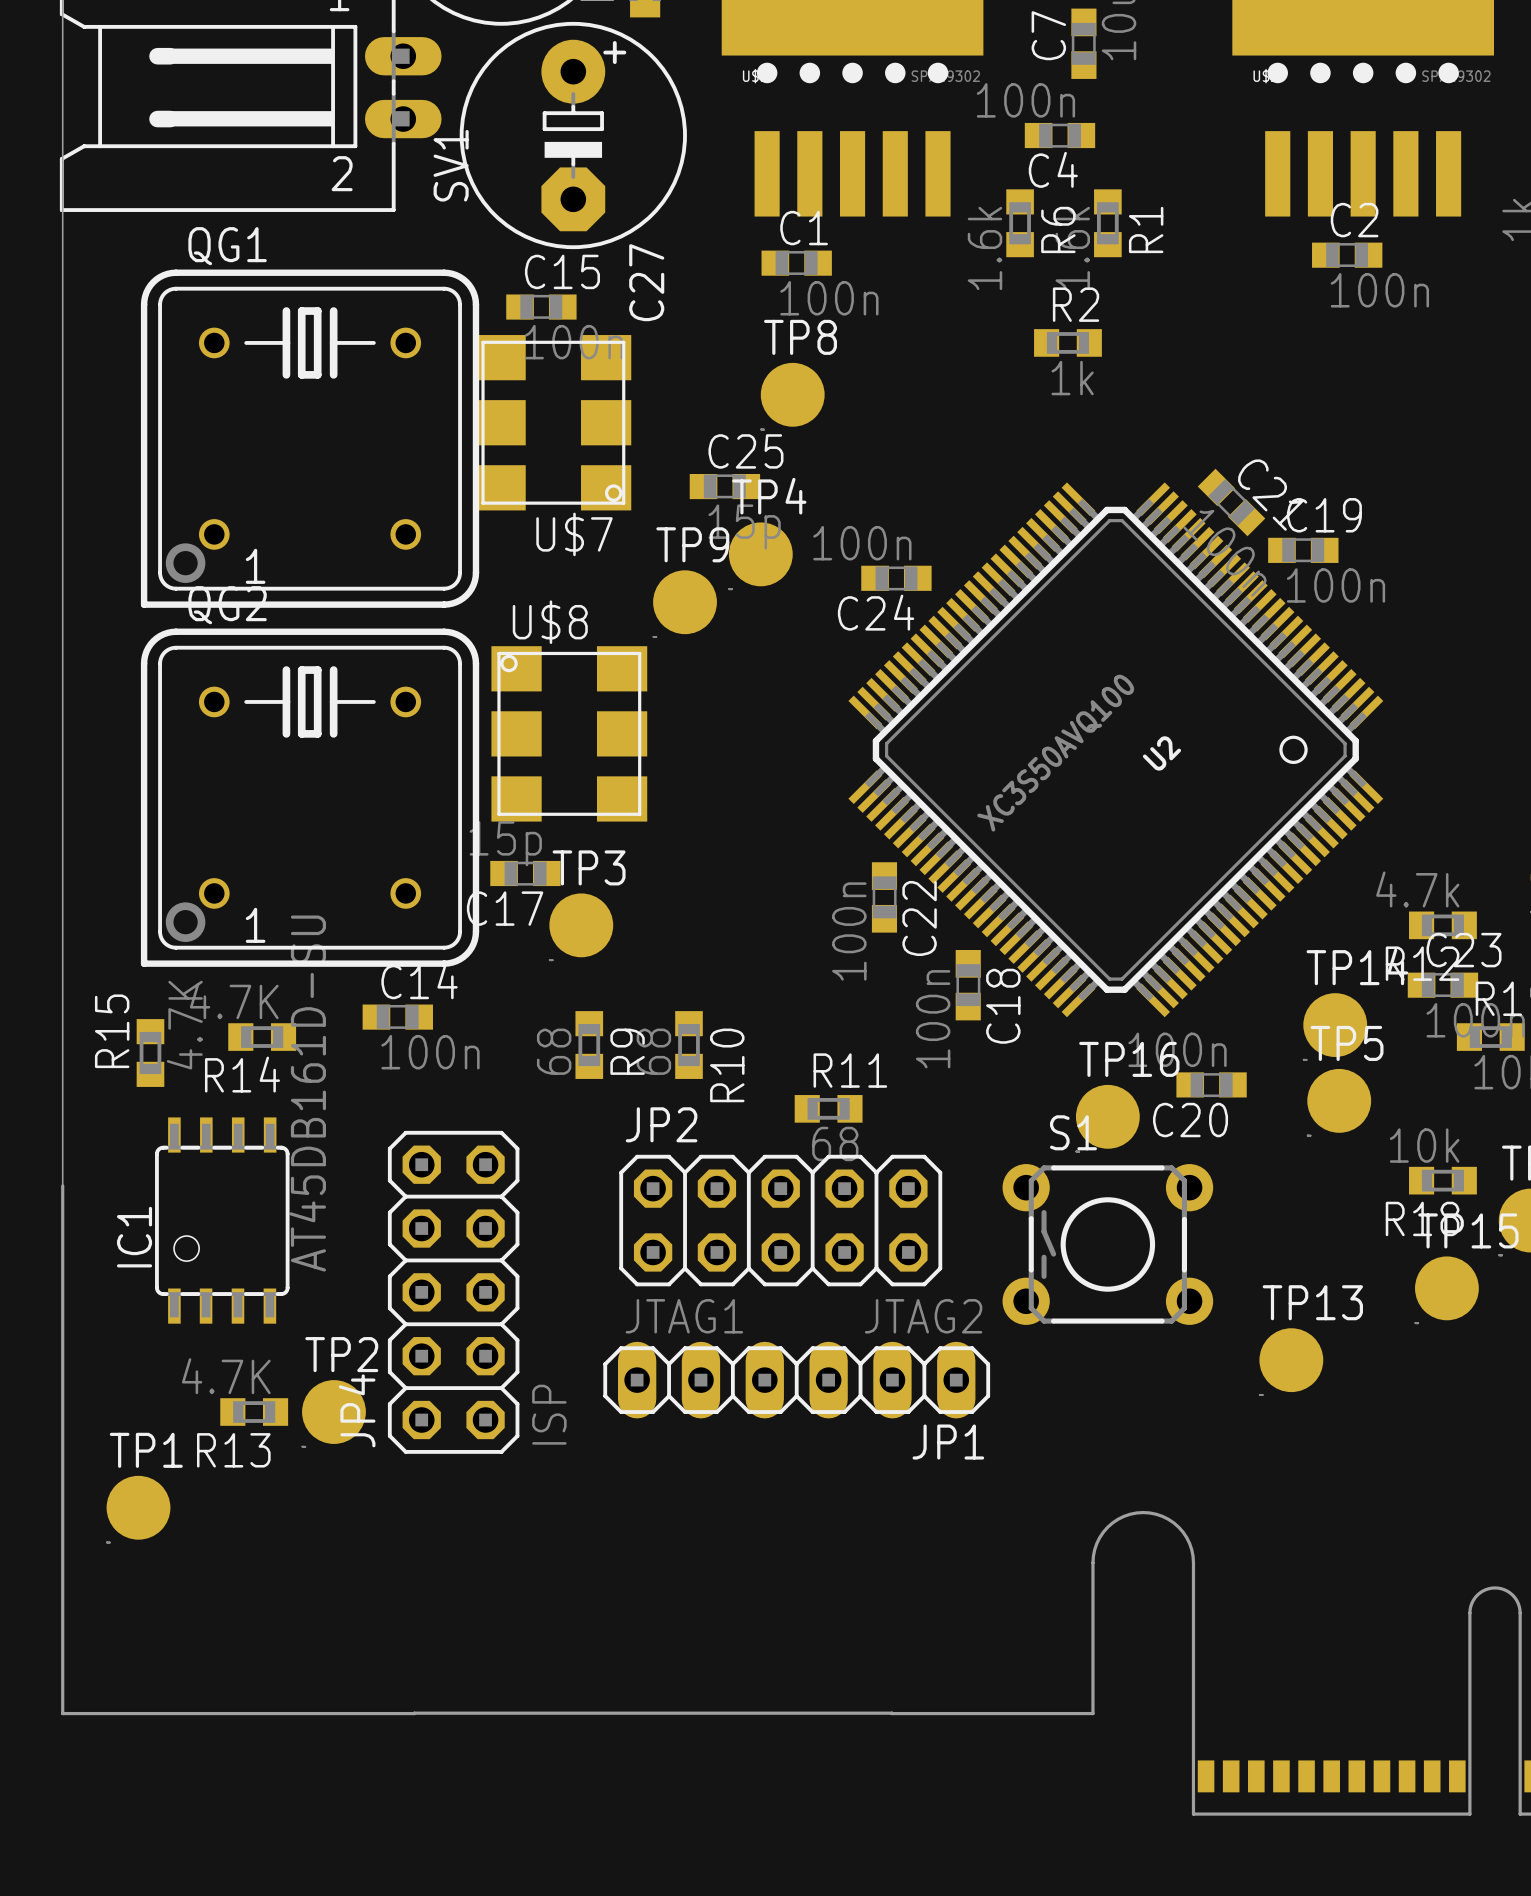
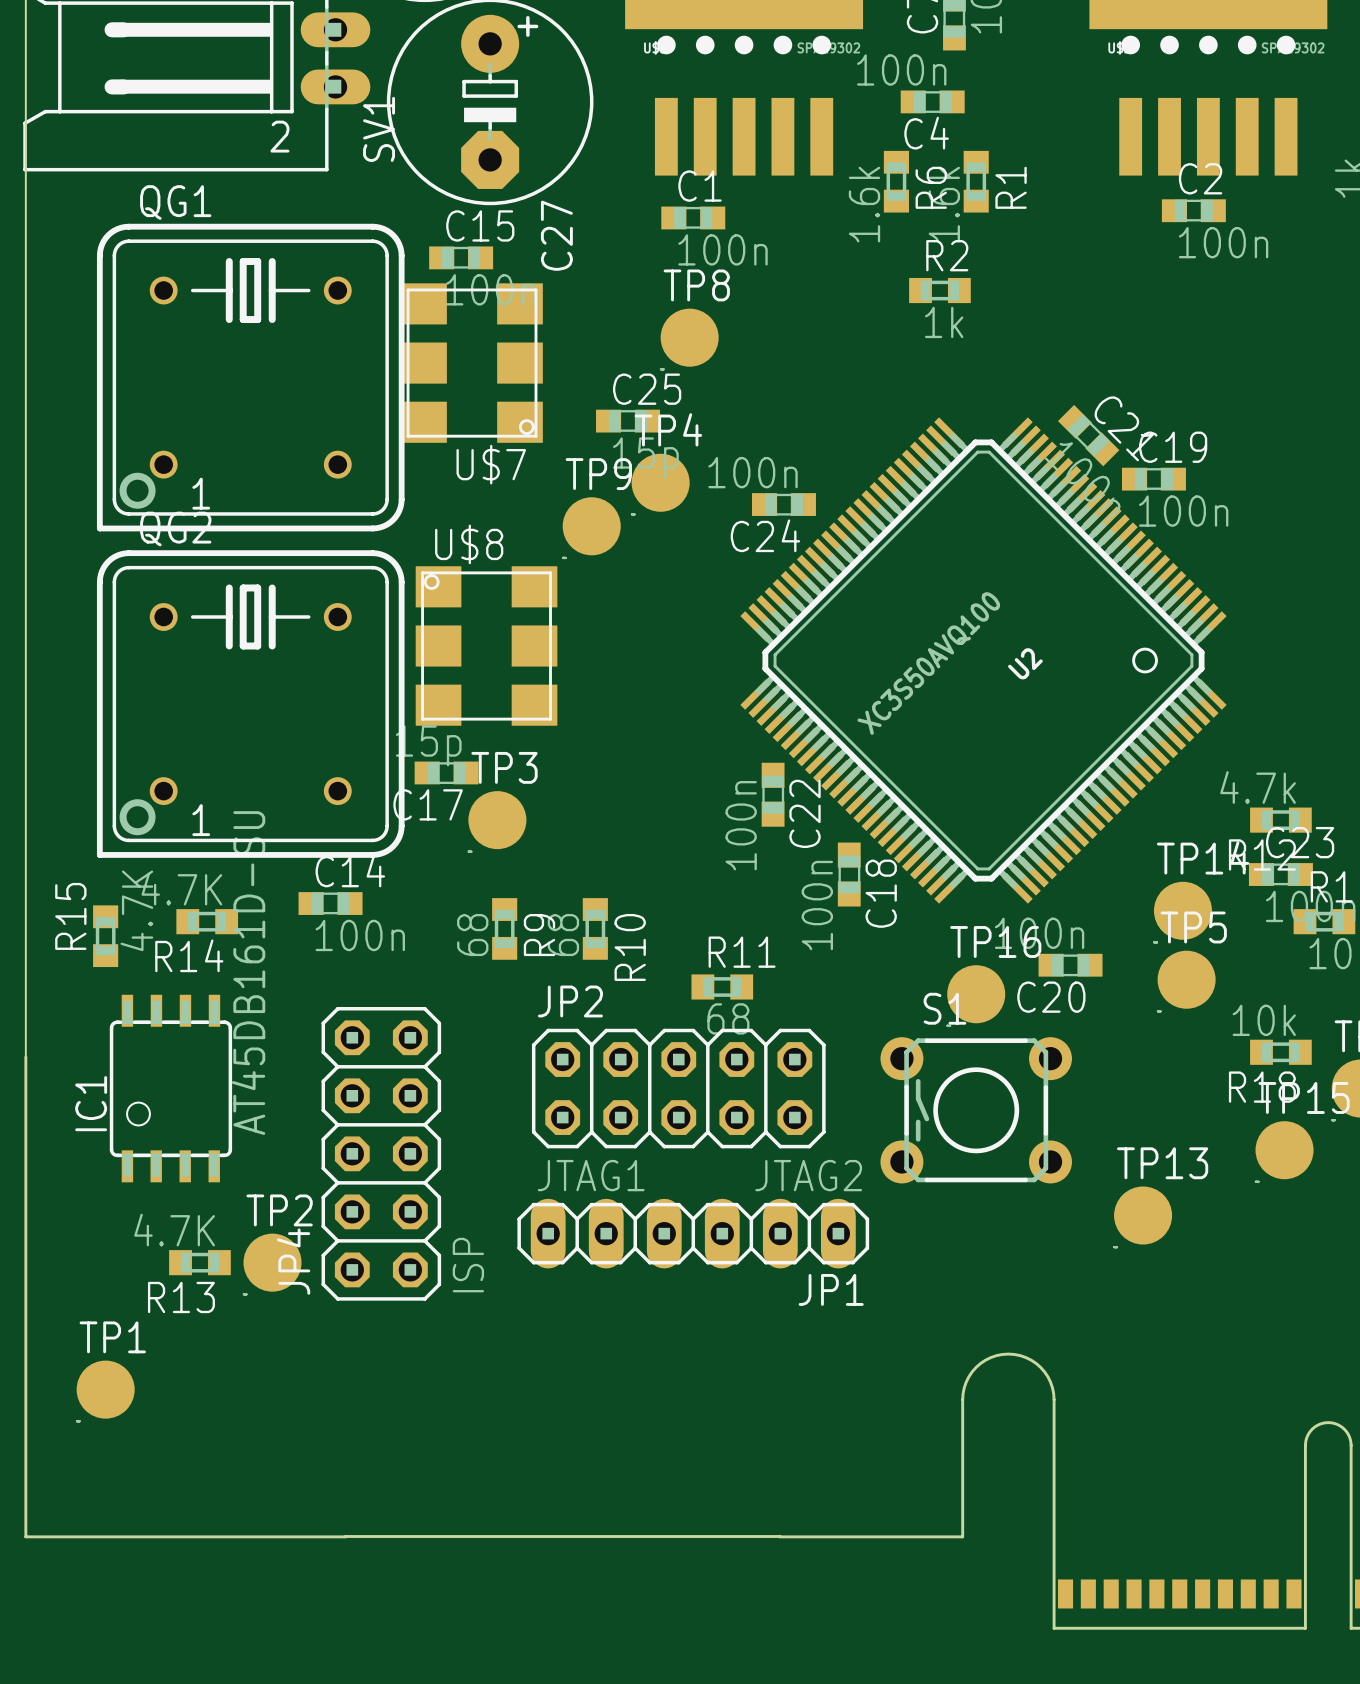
TP1 position: (138, 1507) -> (105, 1389)

